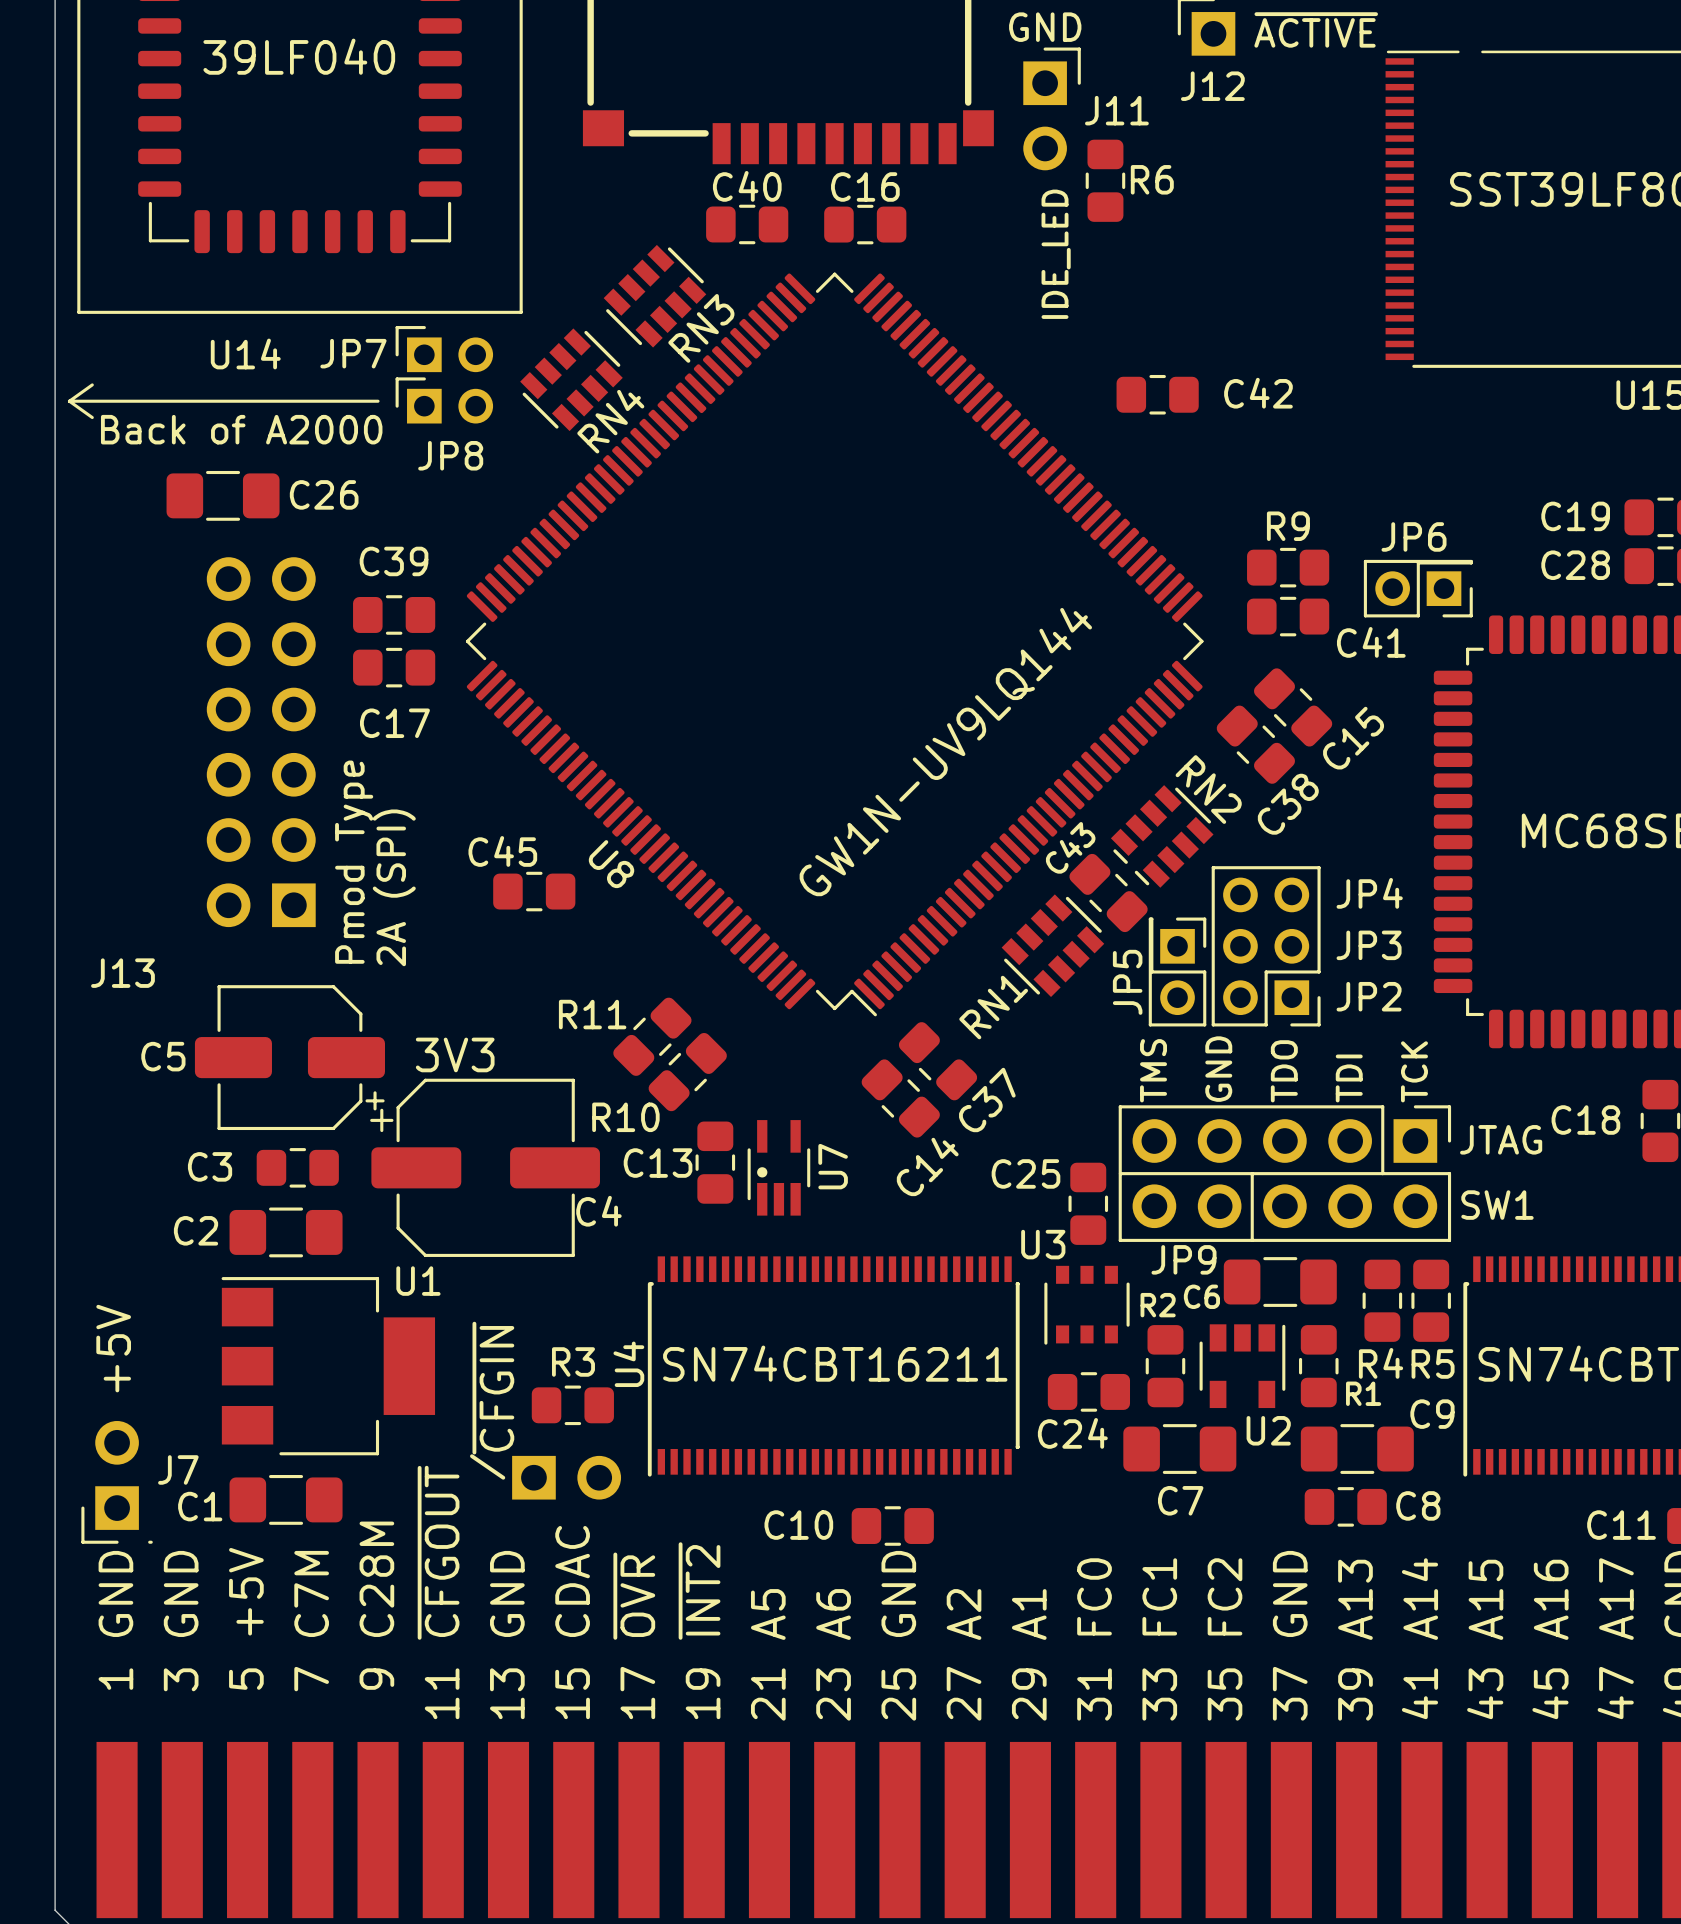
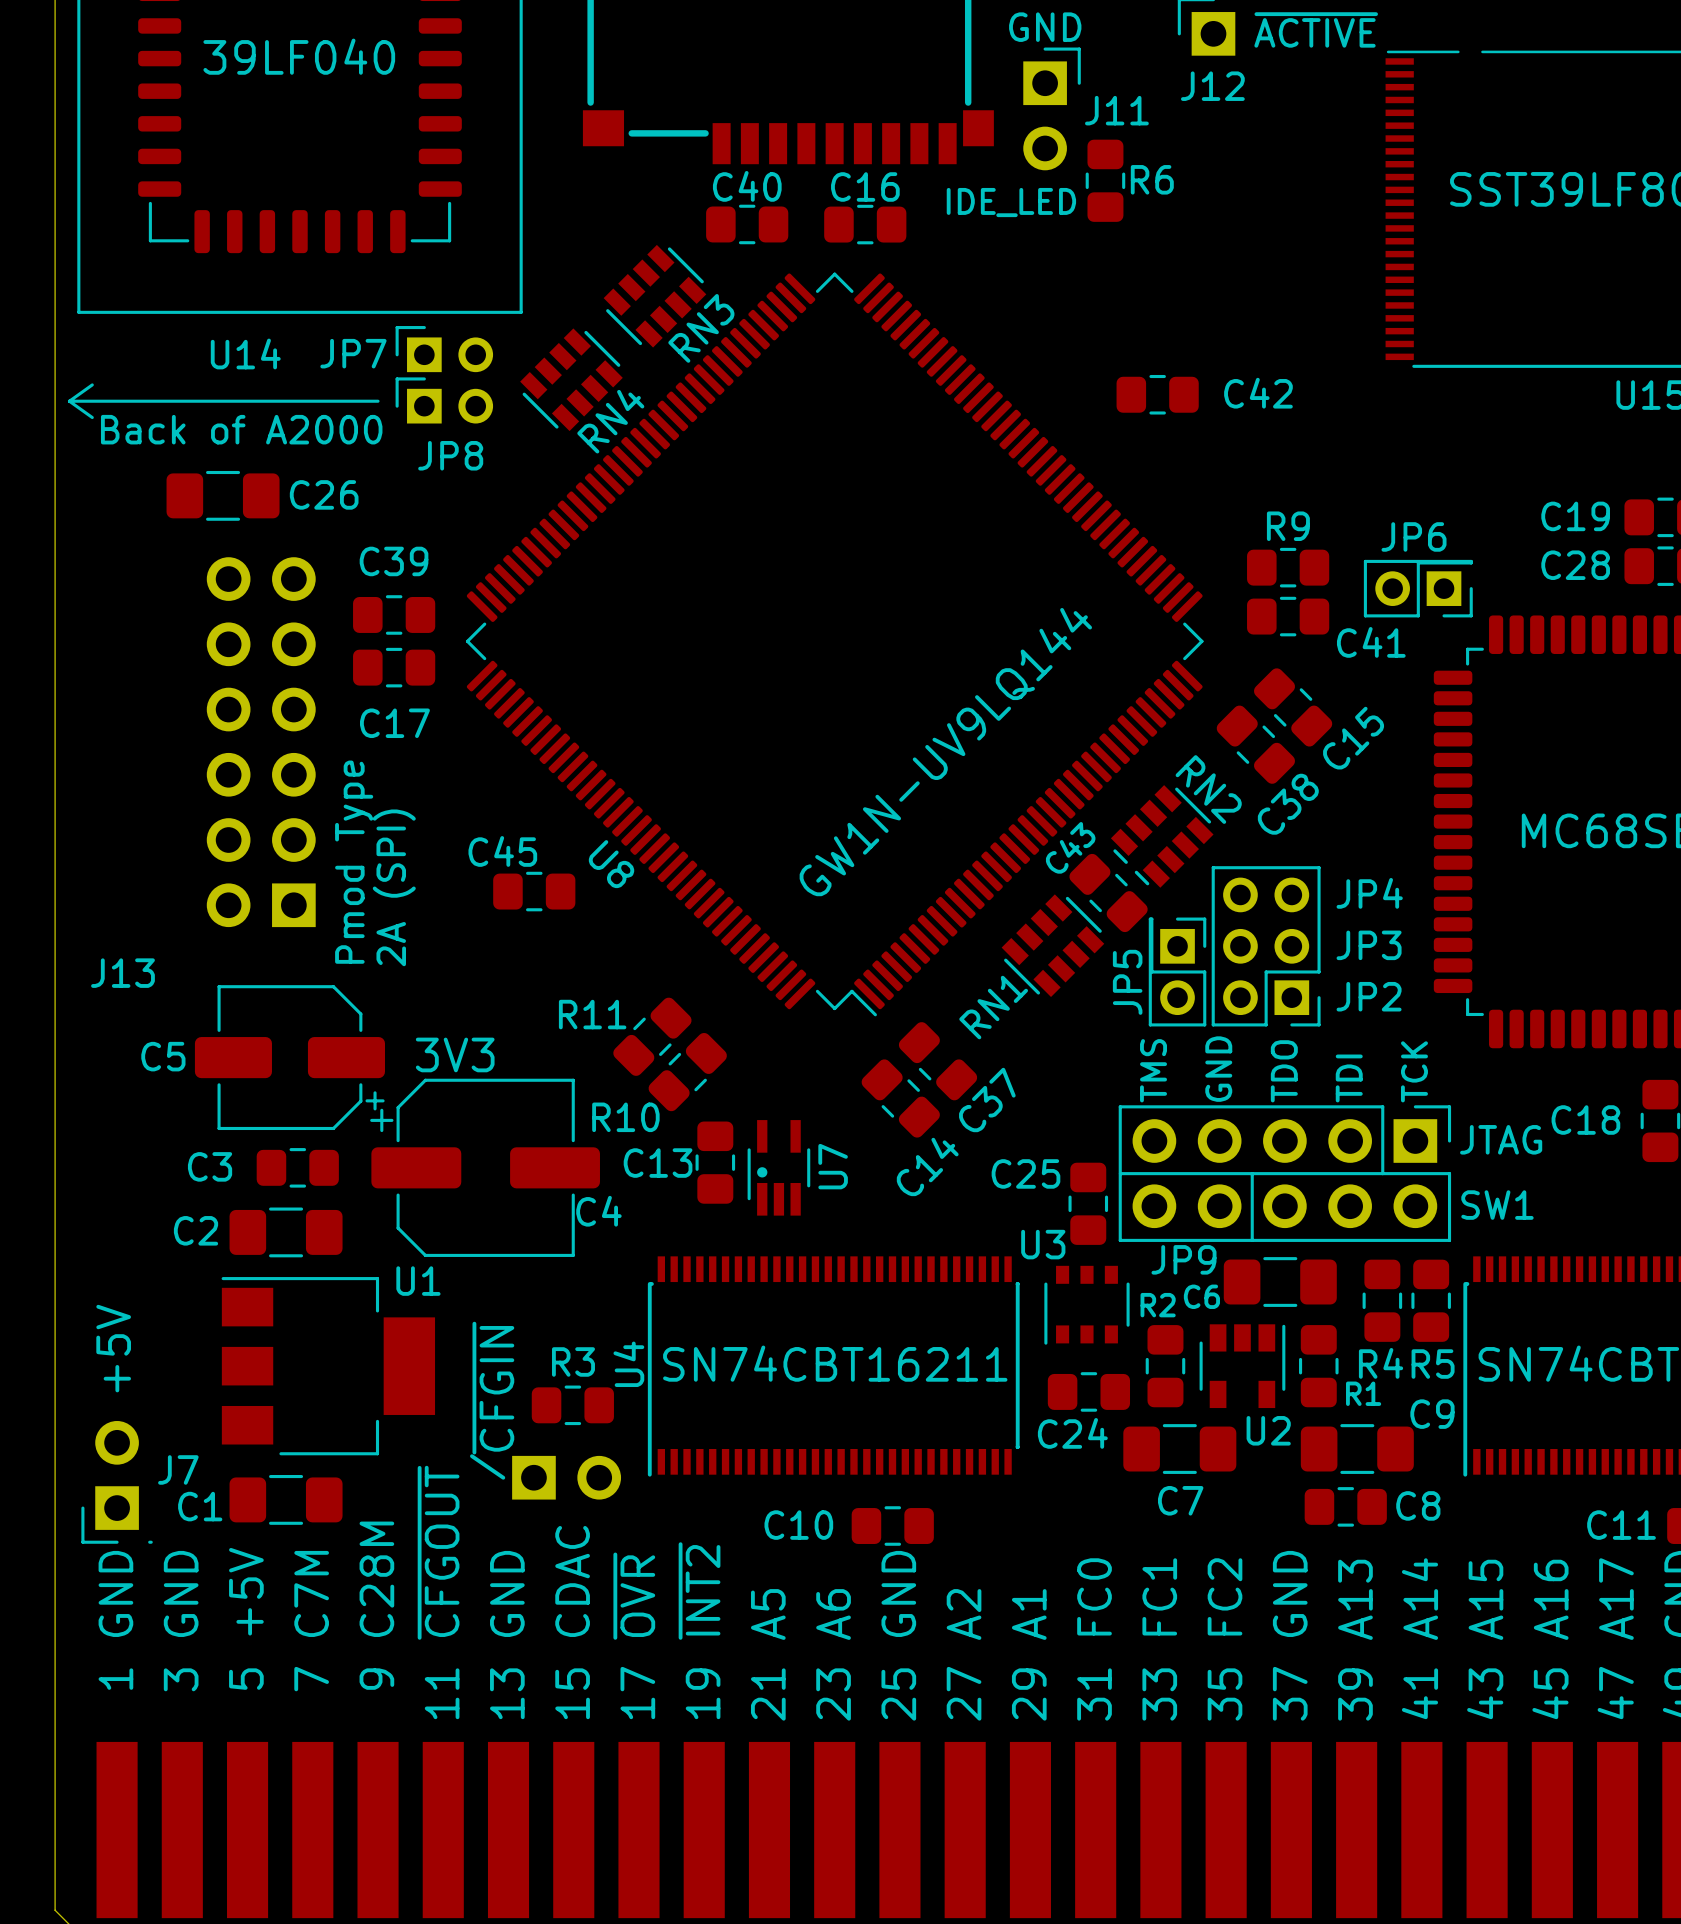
text rotation: 0° (1056, 254) -> 90° clockwise (1011, 202)

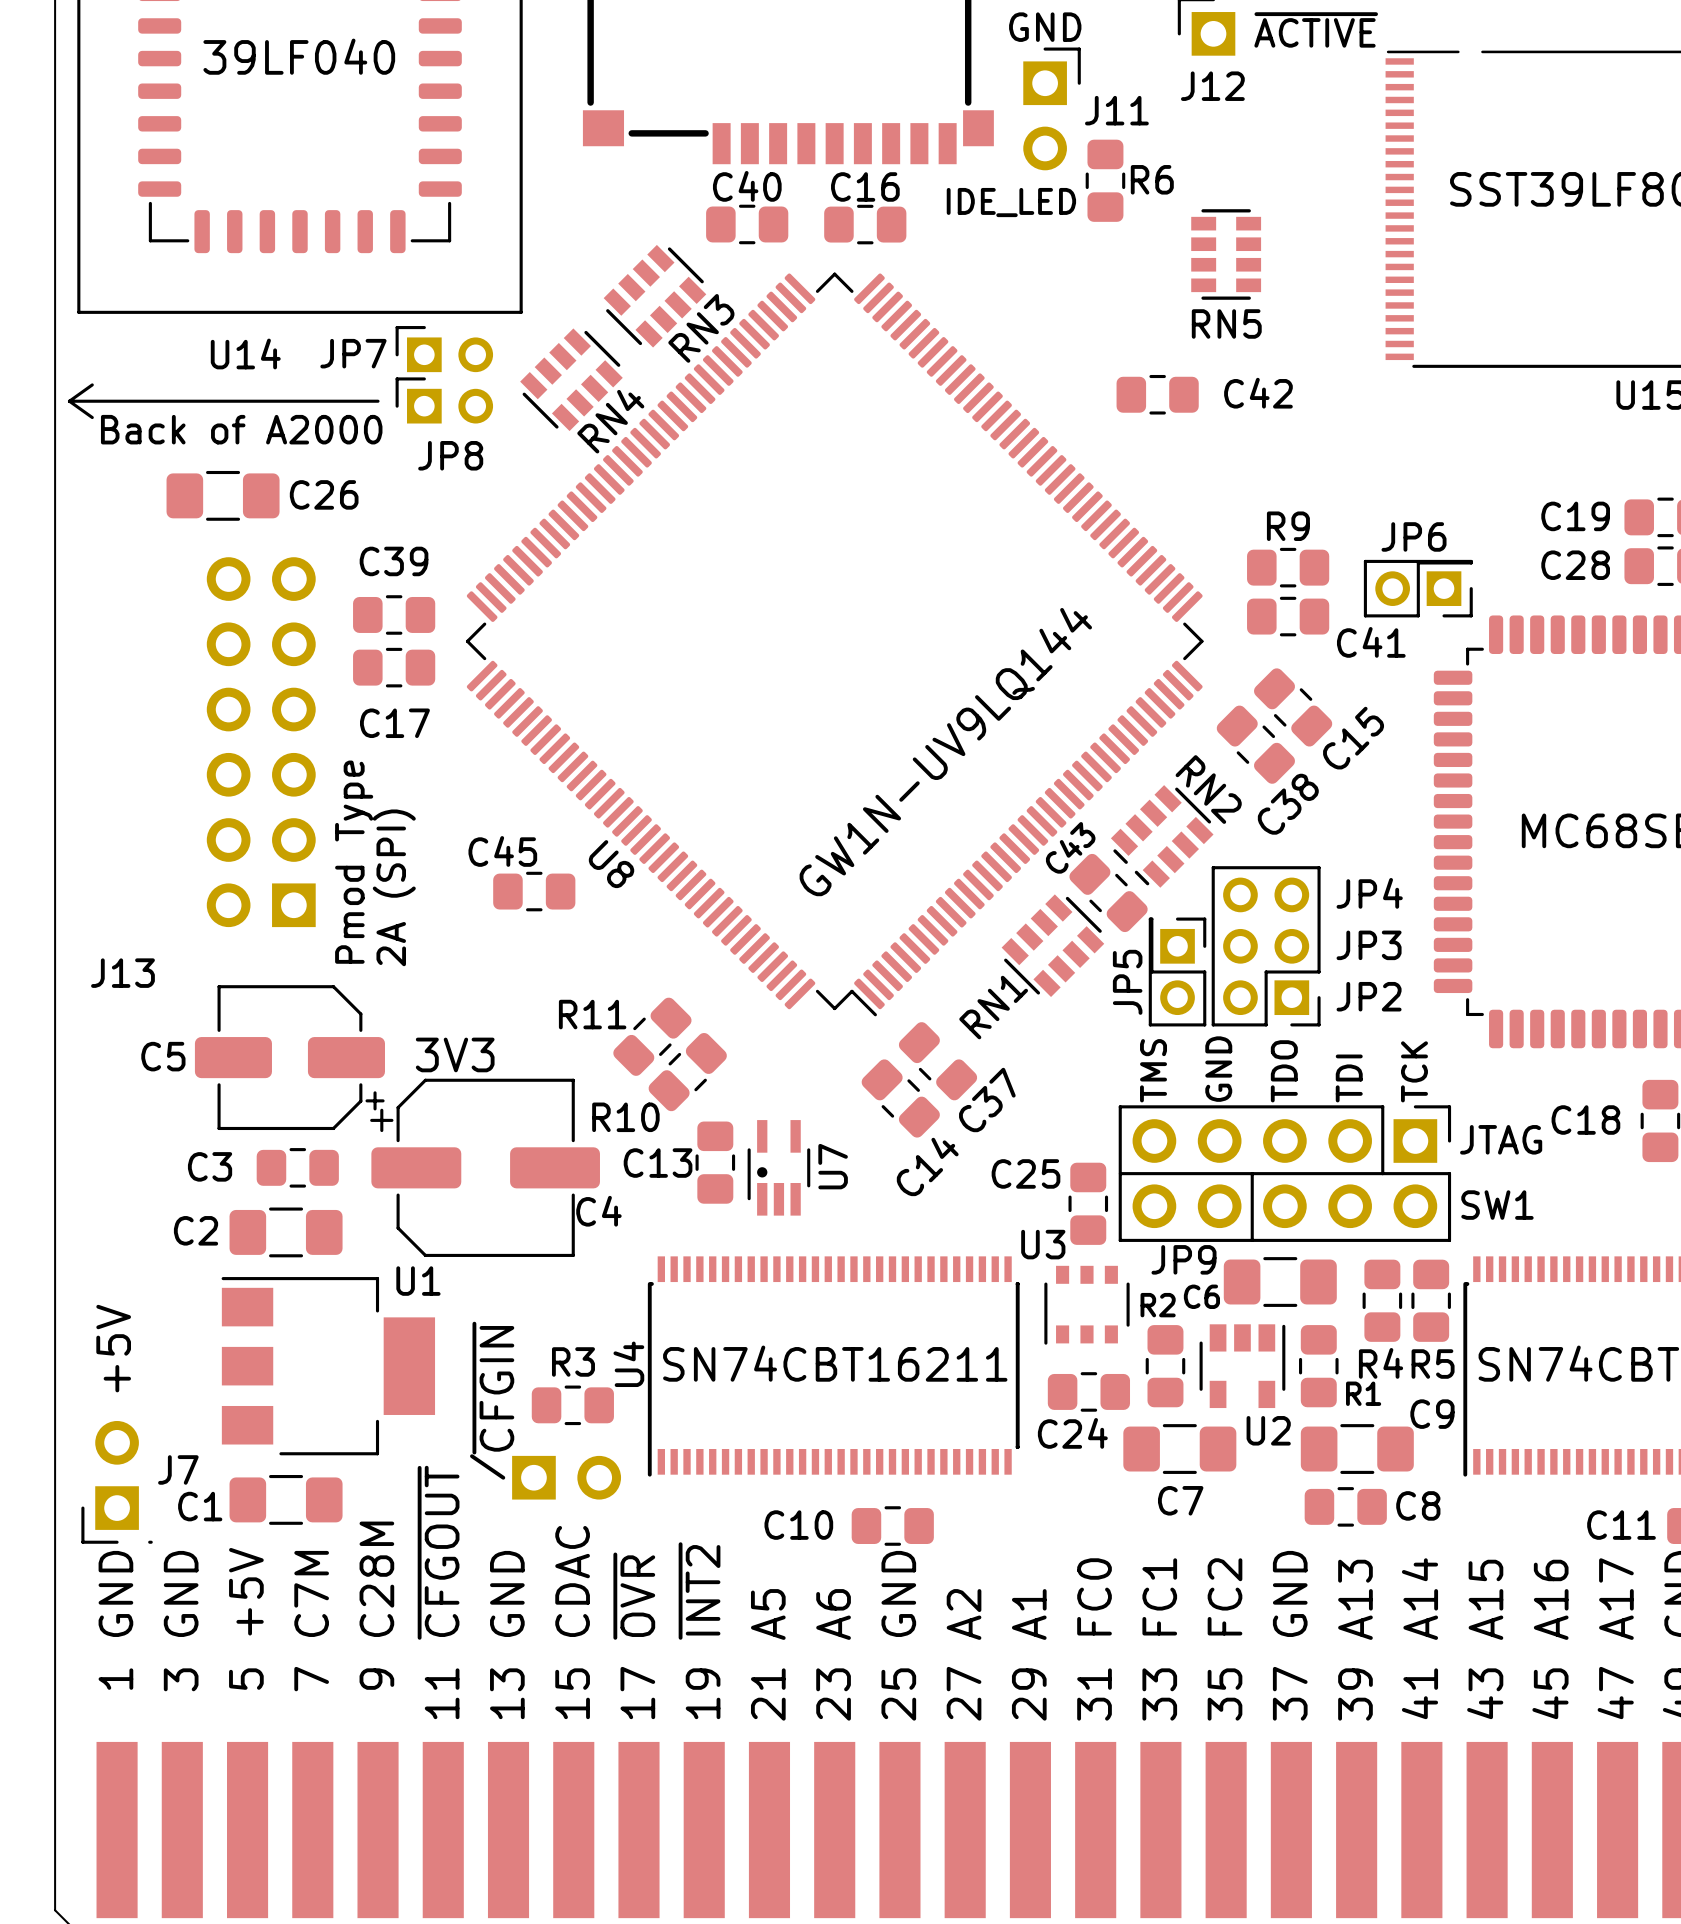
RN5: none -> (1226, 254)

